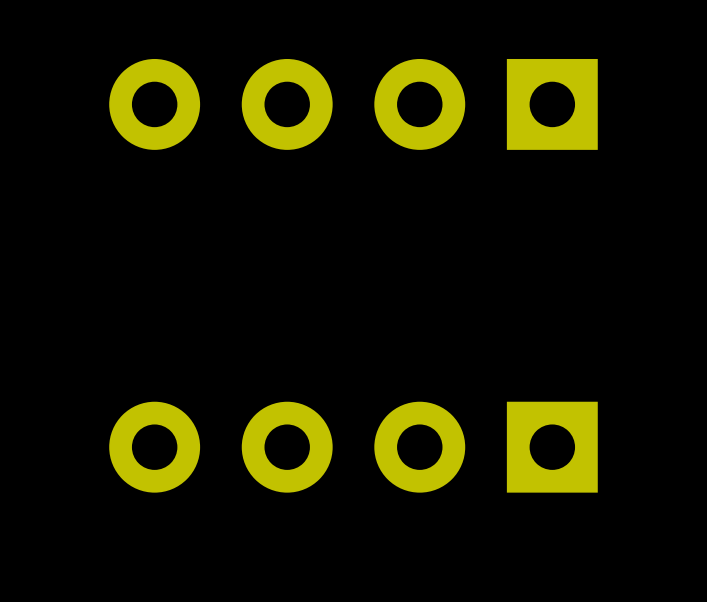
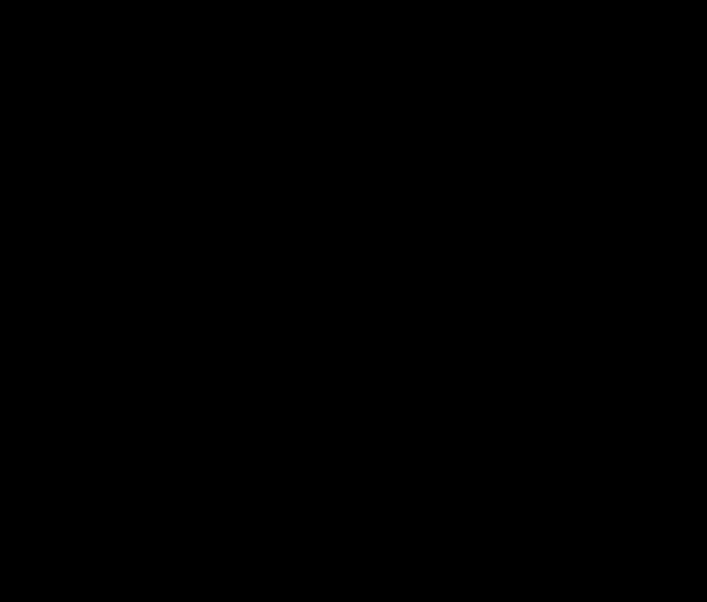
part: (353, 104) -> none
part: (353, 447) -> none

